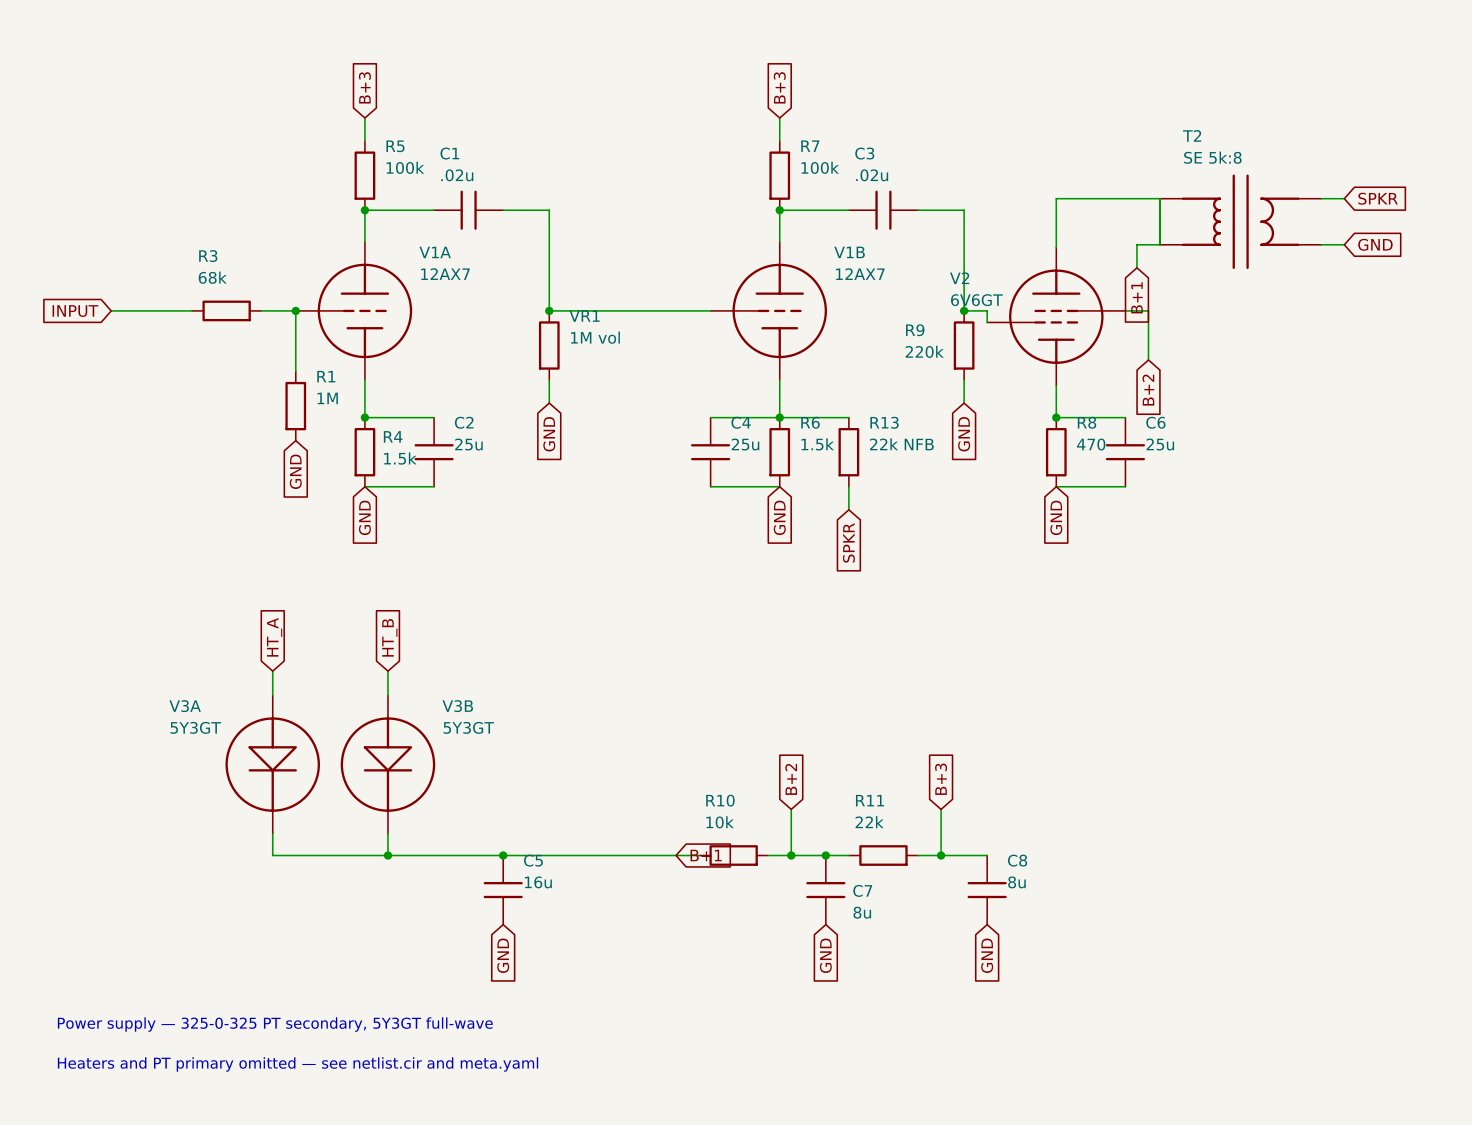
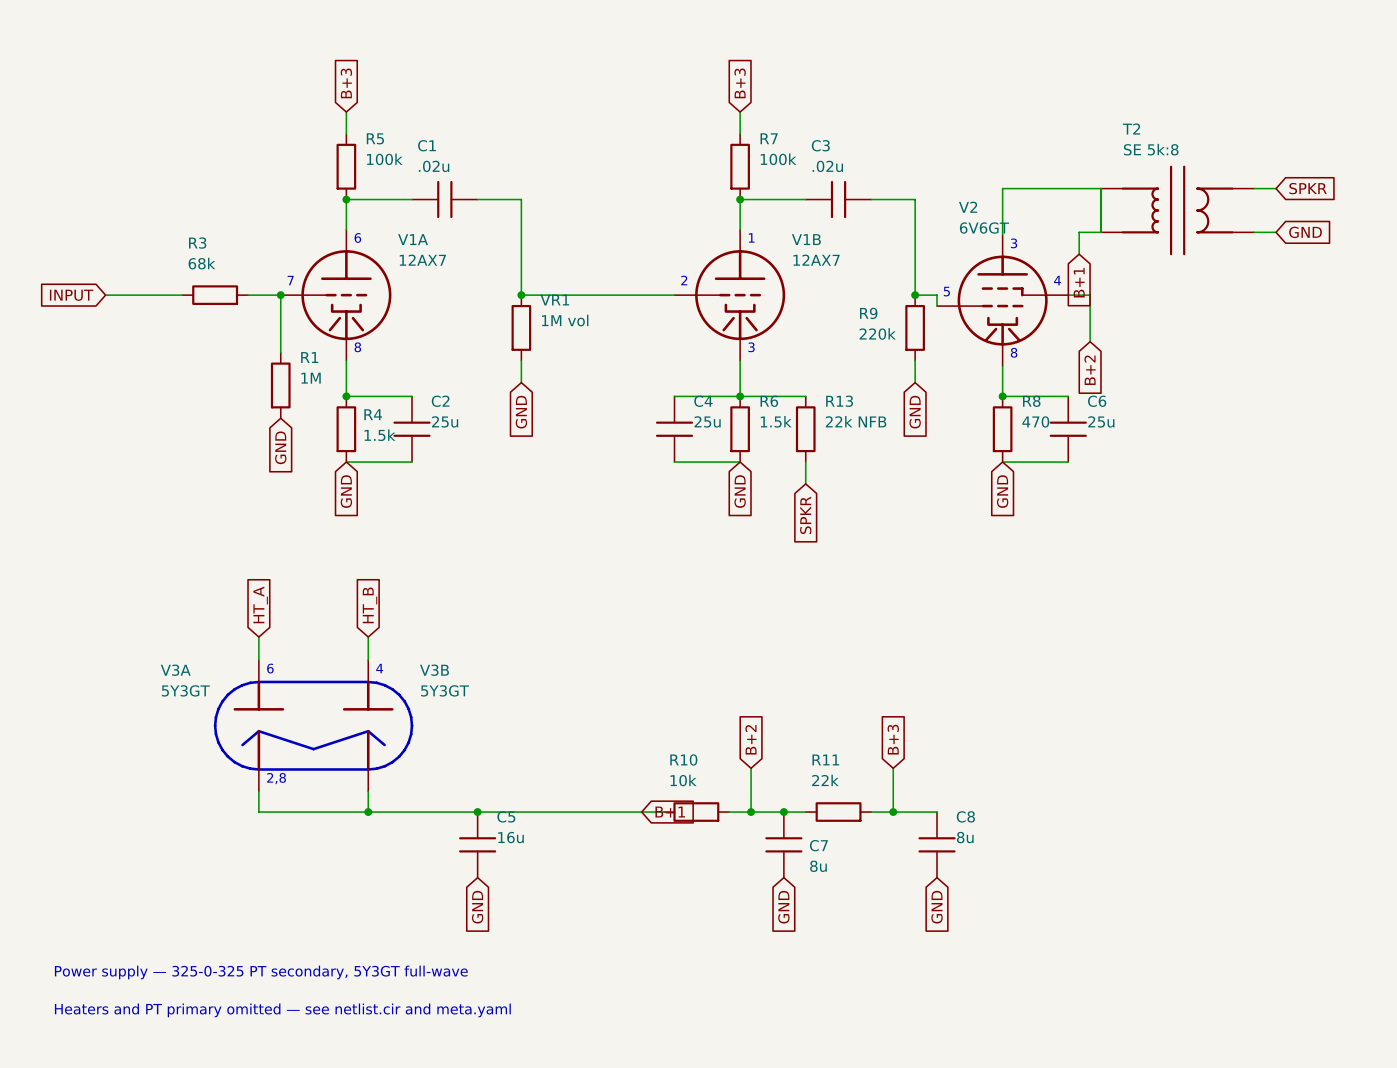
V1A symbol: [295, 241, 413, 381] -> [280, 229, 392, 361]
V1B symbol: [710, 241, 827, 381] -> [674, 229, 786, 361]
V2 symbol: [987, 247, 1126, 386] -> [936, 234, 1069, 367]
text: none -> 6 (357, 237)
text: none -> 1 (751, 237)
text: none -> 3 (1014, 243)
V2 name position: V2 (959, 278) -> V2 (968, 207)
text: none -> 7 (290, 280)
text: none -> 2 (684, 280)
text: none -> 4 (1057, 280)
V2 value position: 6V6GT (976, 300) -> 6V6GT (984, 228)
text: none -> 5 (946, 291)
text: none -> 8 (357, 347)
text: none -> 3 (751, 347)
text: none -> 8 (1014, 352)
V3A symbol: [225, 695, 320, 834] -> [233, 660, 285, 792]
V3B symbol: [340, 695, 436, 834] -> [342, 660, 394, 792]
text: none -> 6 (270, 668)
text: none -> 4 (379, 668)
line: none -> (258, 681) (242, 685) (234, 689) (222, 701) (215, 717) (215, 734) (222, 750) (234, 762) (242, 766) (258, 769) (376, 768) (392, 762) (404, 750) (408, 742) (412, 725) (408, 709) (399, 694) (384, 685) (368, 681) (258, 681)
line: none -> (242, 744) (258, 731) (313, 749) (368, 731) (384, 744)
text: none -> 2,8 (276, 778)

